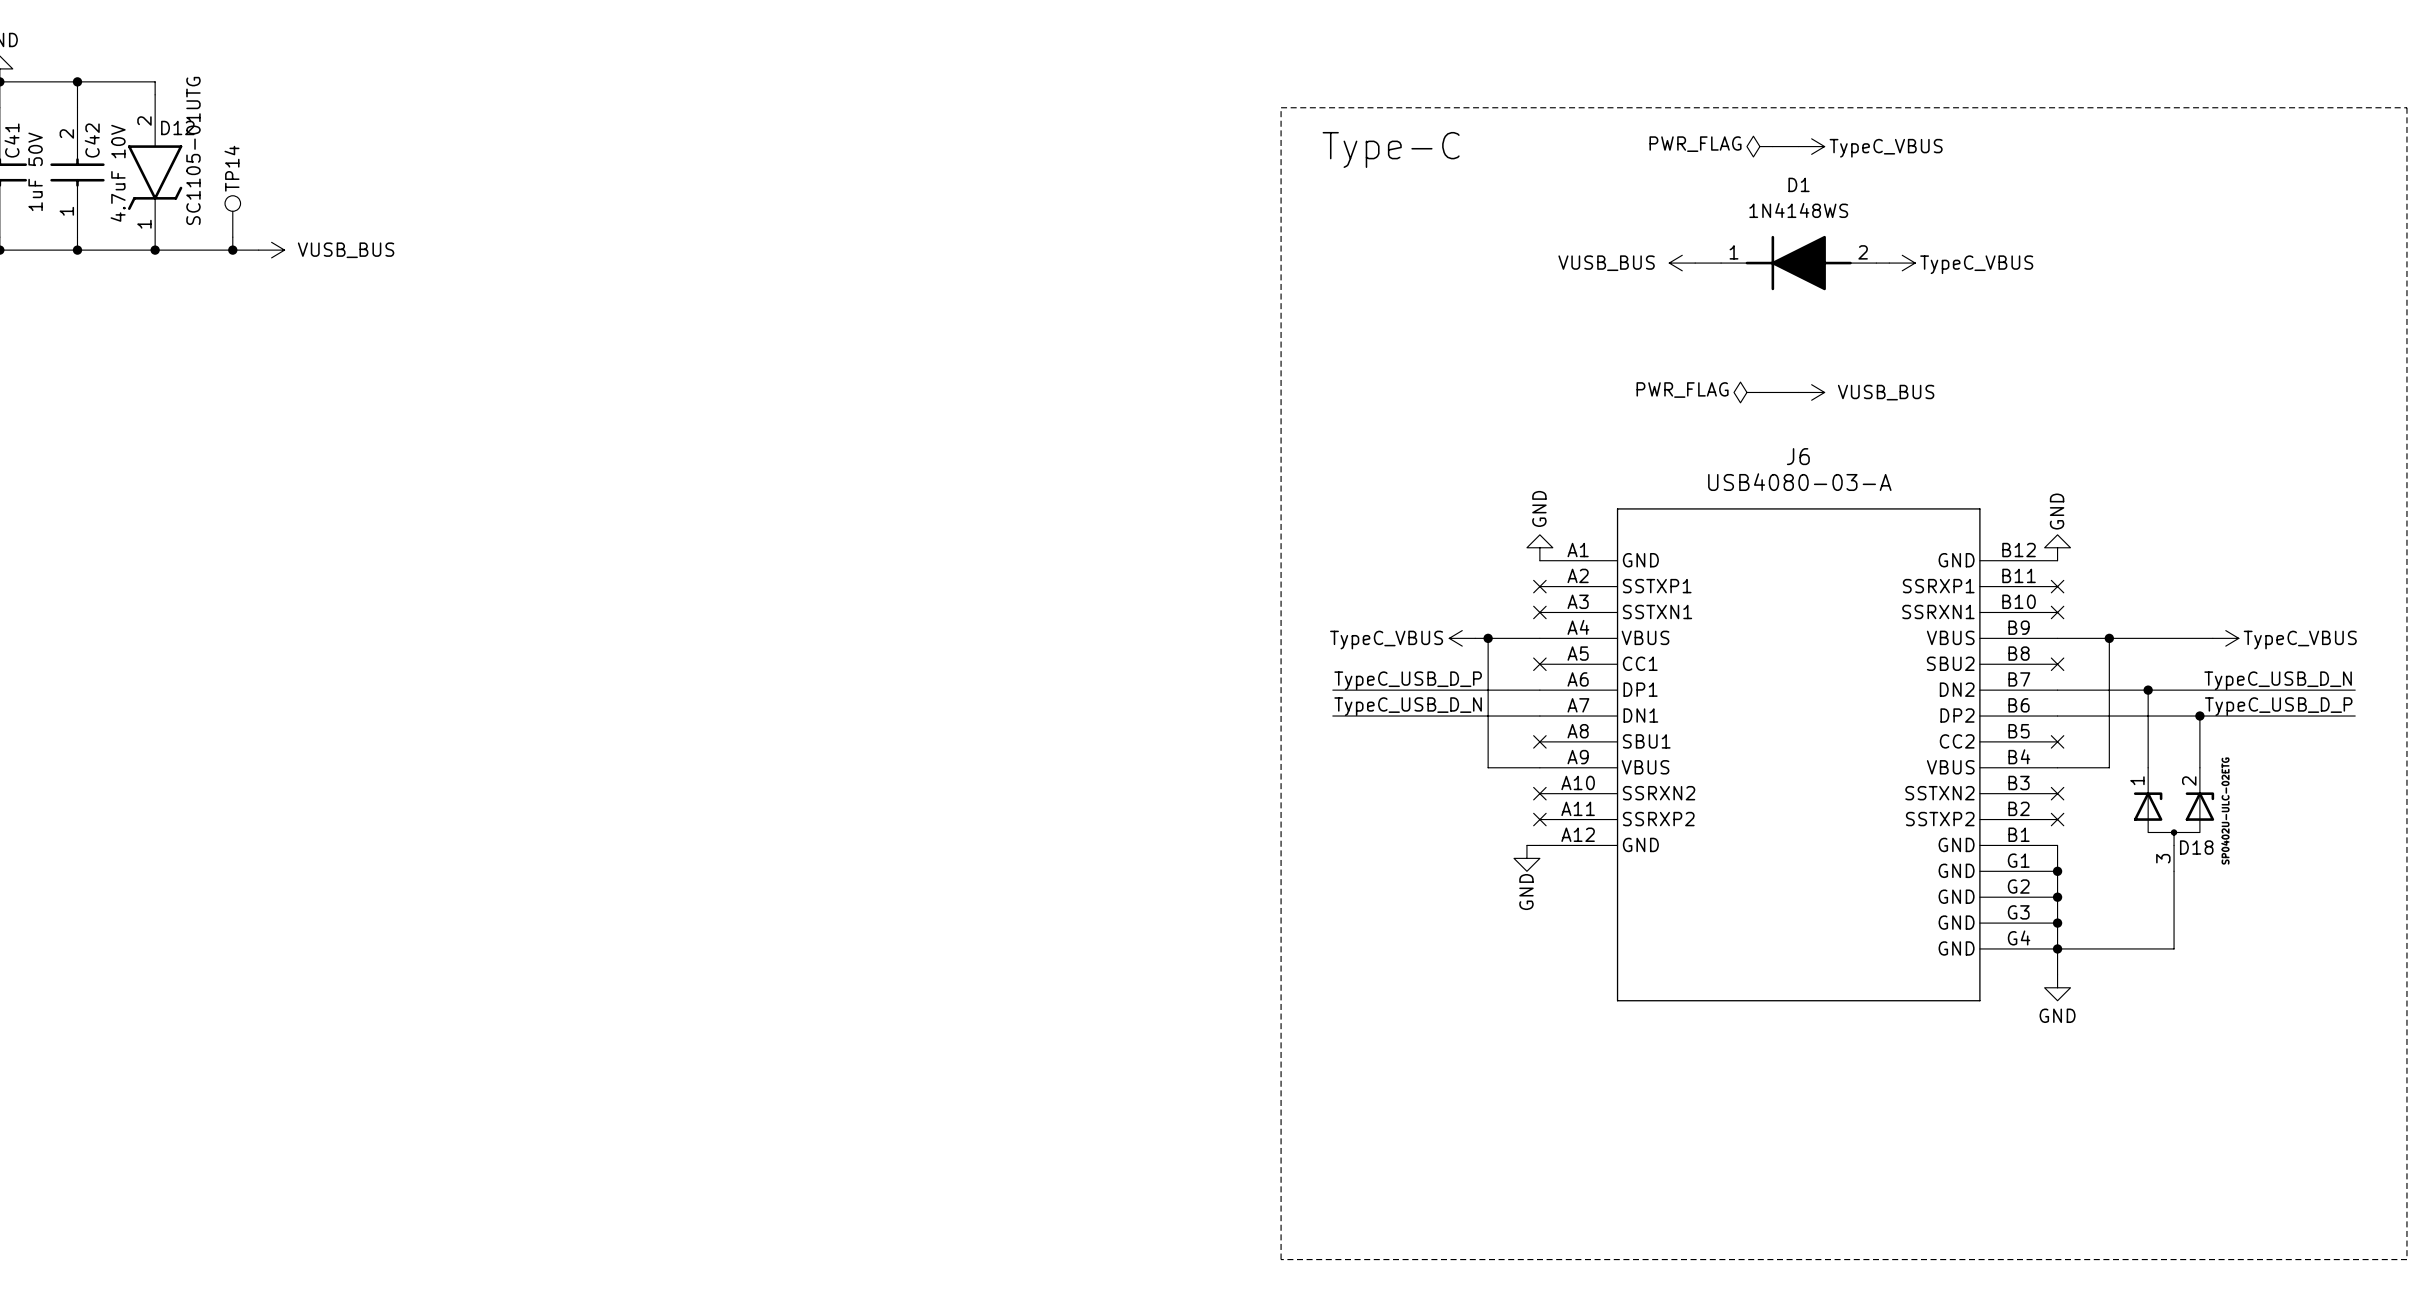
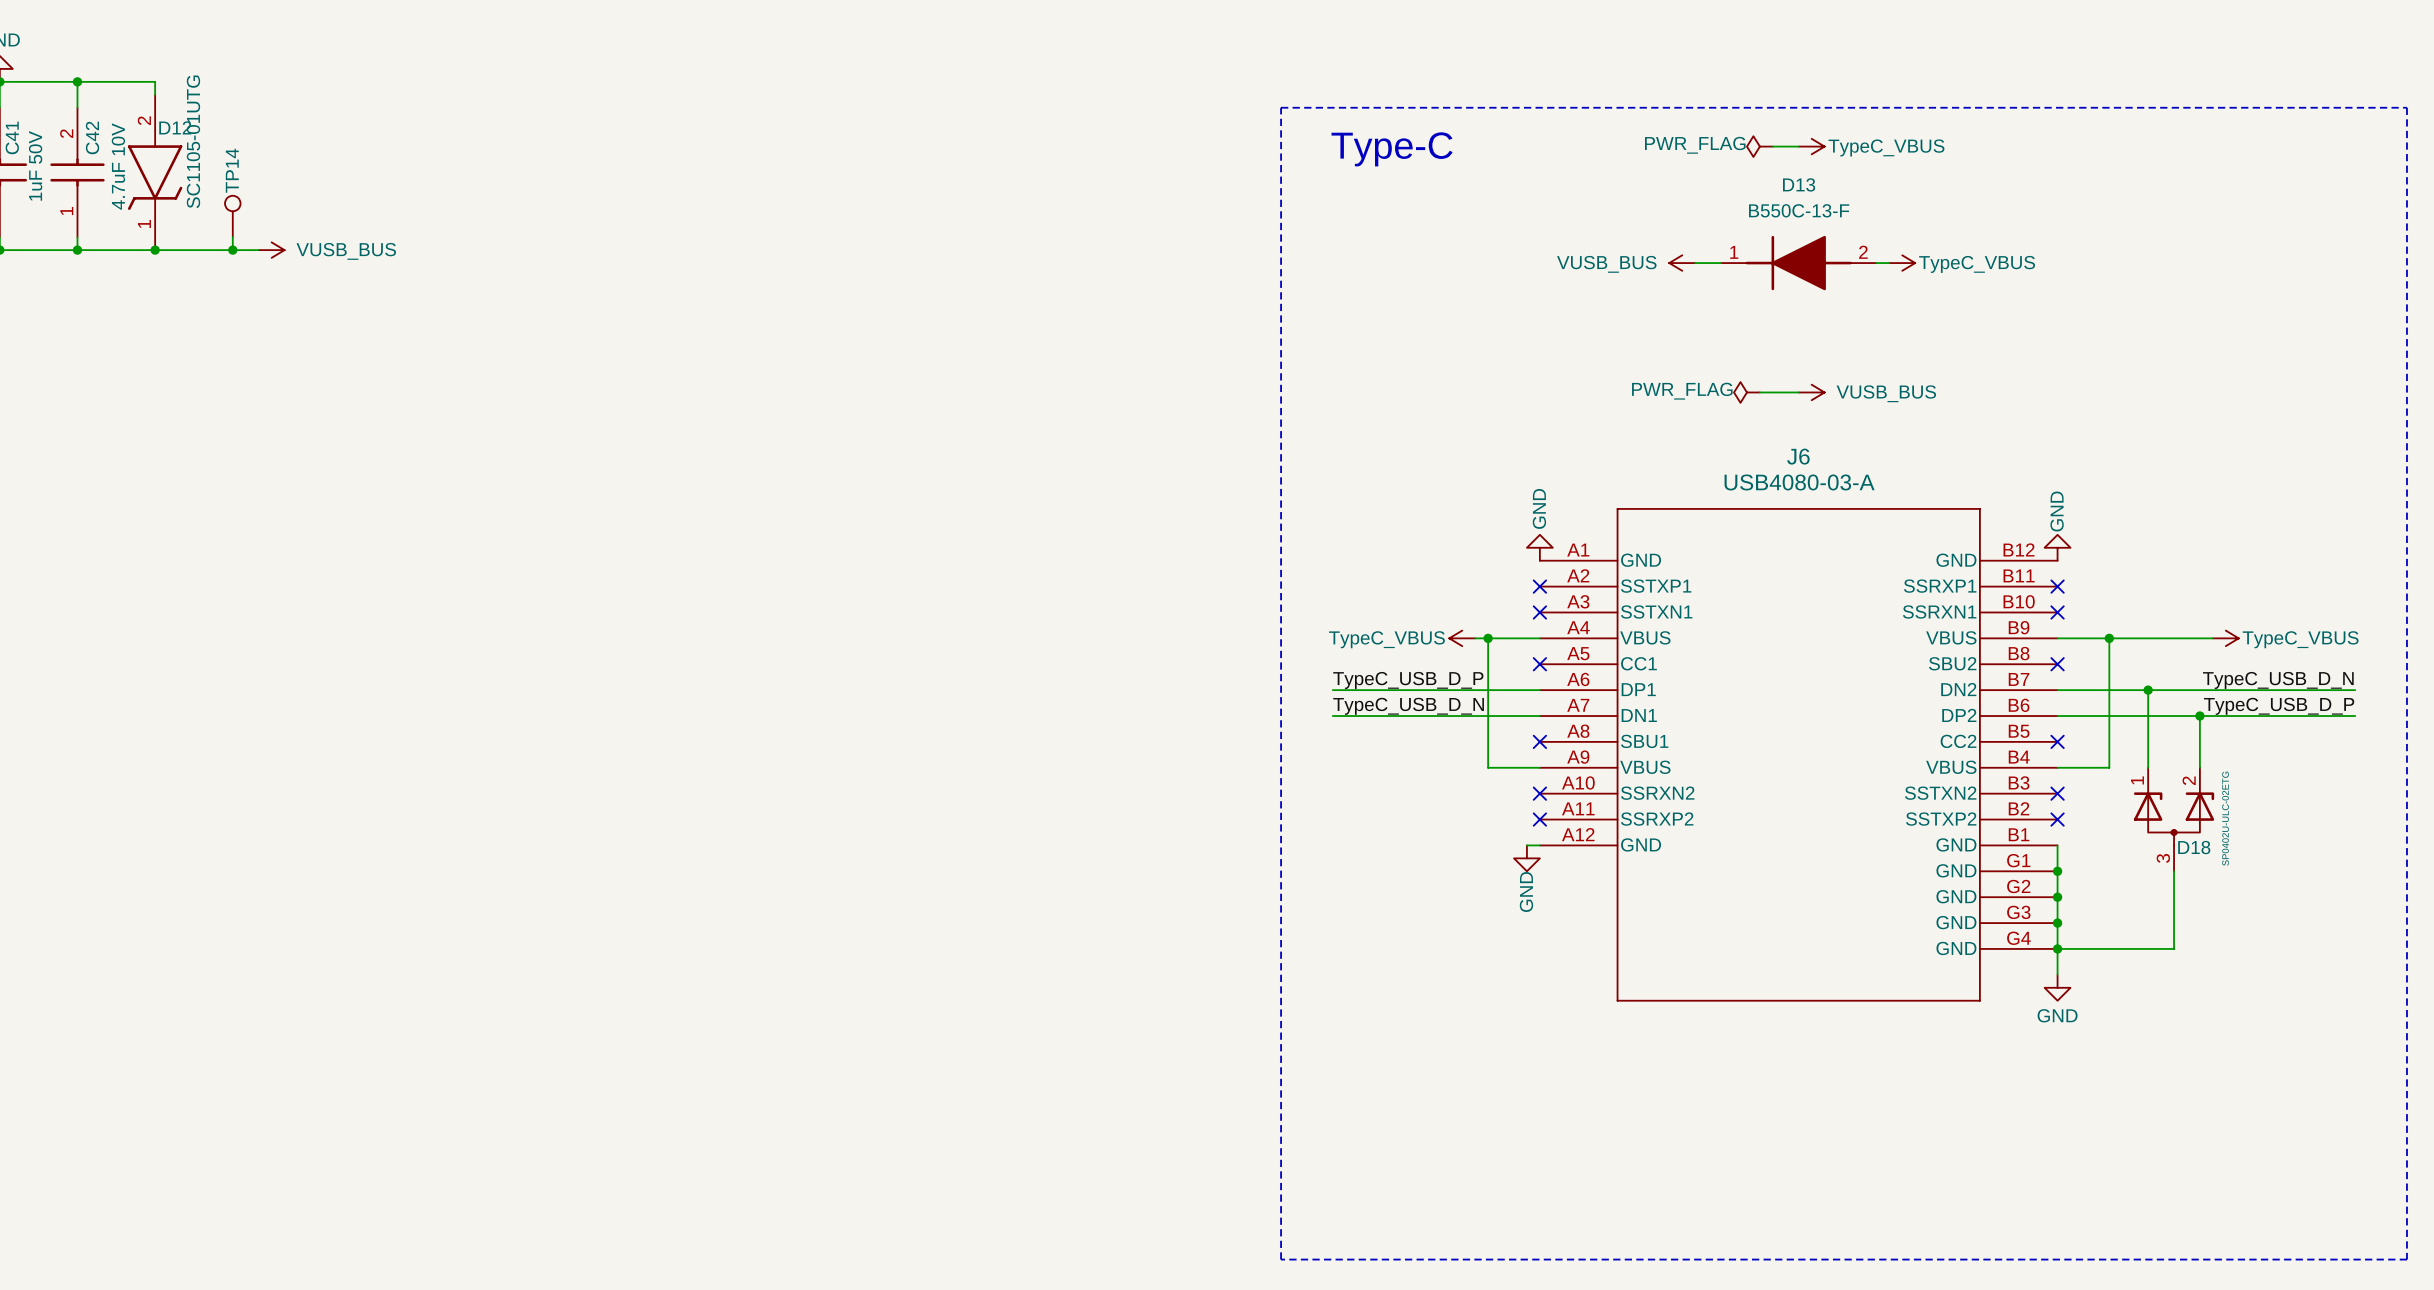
D1 name: D1 (1799, 184) -> D13 (1799, 184)
D1 value: 1N4148WS (1798, 210) -> B550C-13-F (1799, 210)

